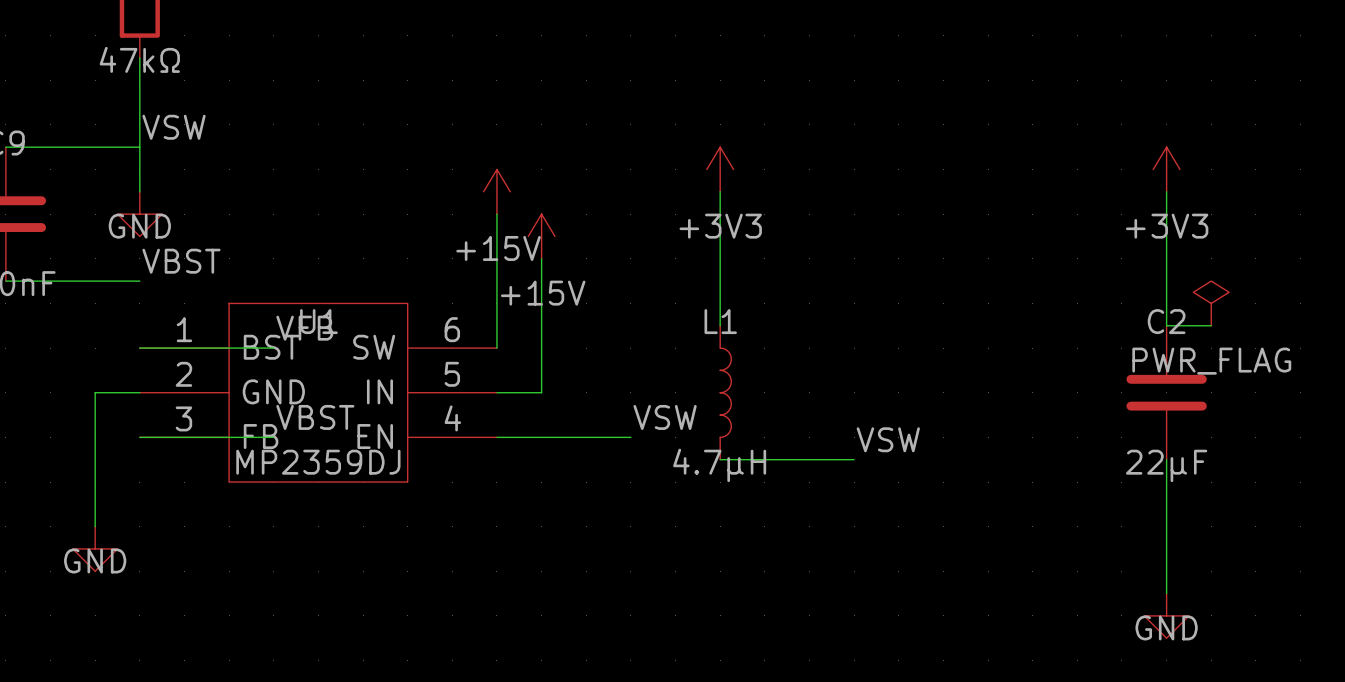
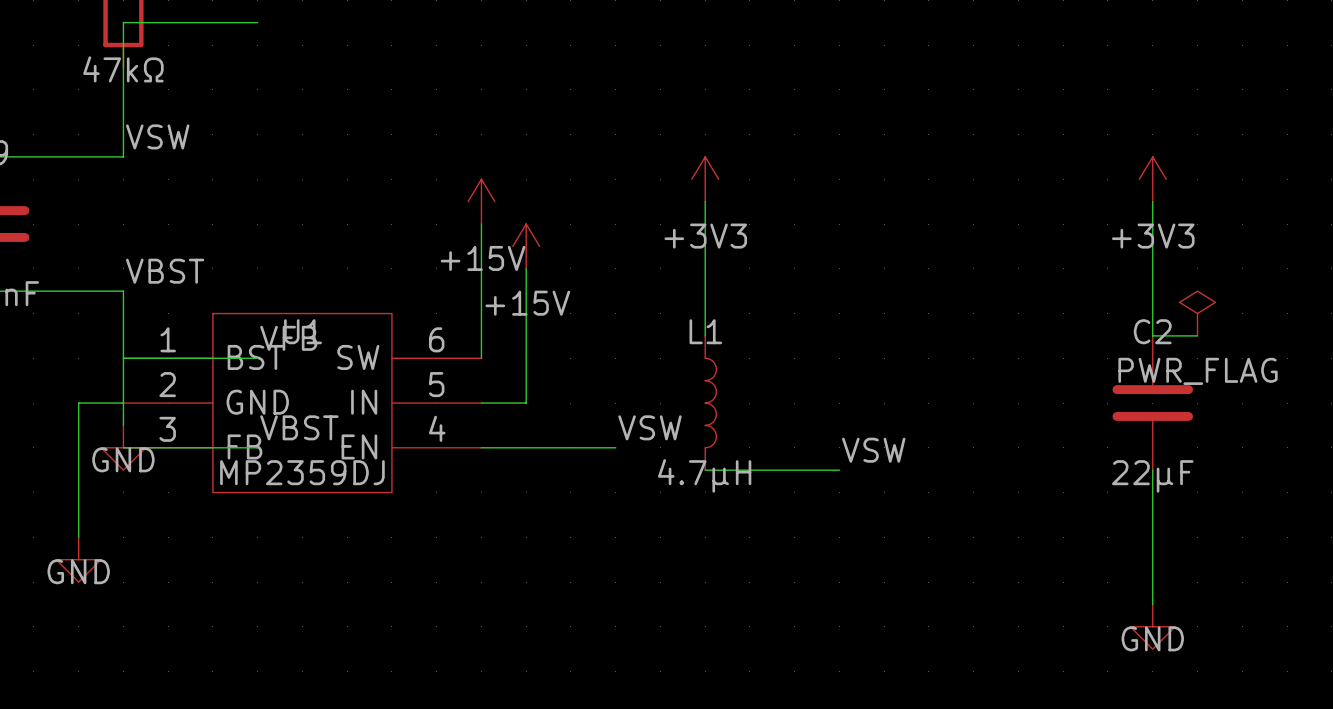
wire: none -> (257, 22) (123, 22) (123, 67)
wire: (139, 147) (139, 191) -> none
power symbol position: GND (139, 214) -> GND (123, 447)
wire: none -> (123, 291) (123, 425)

